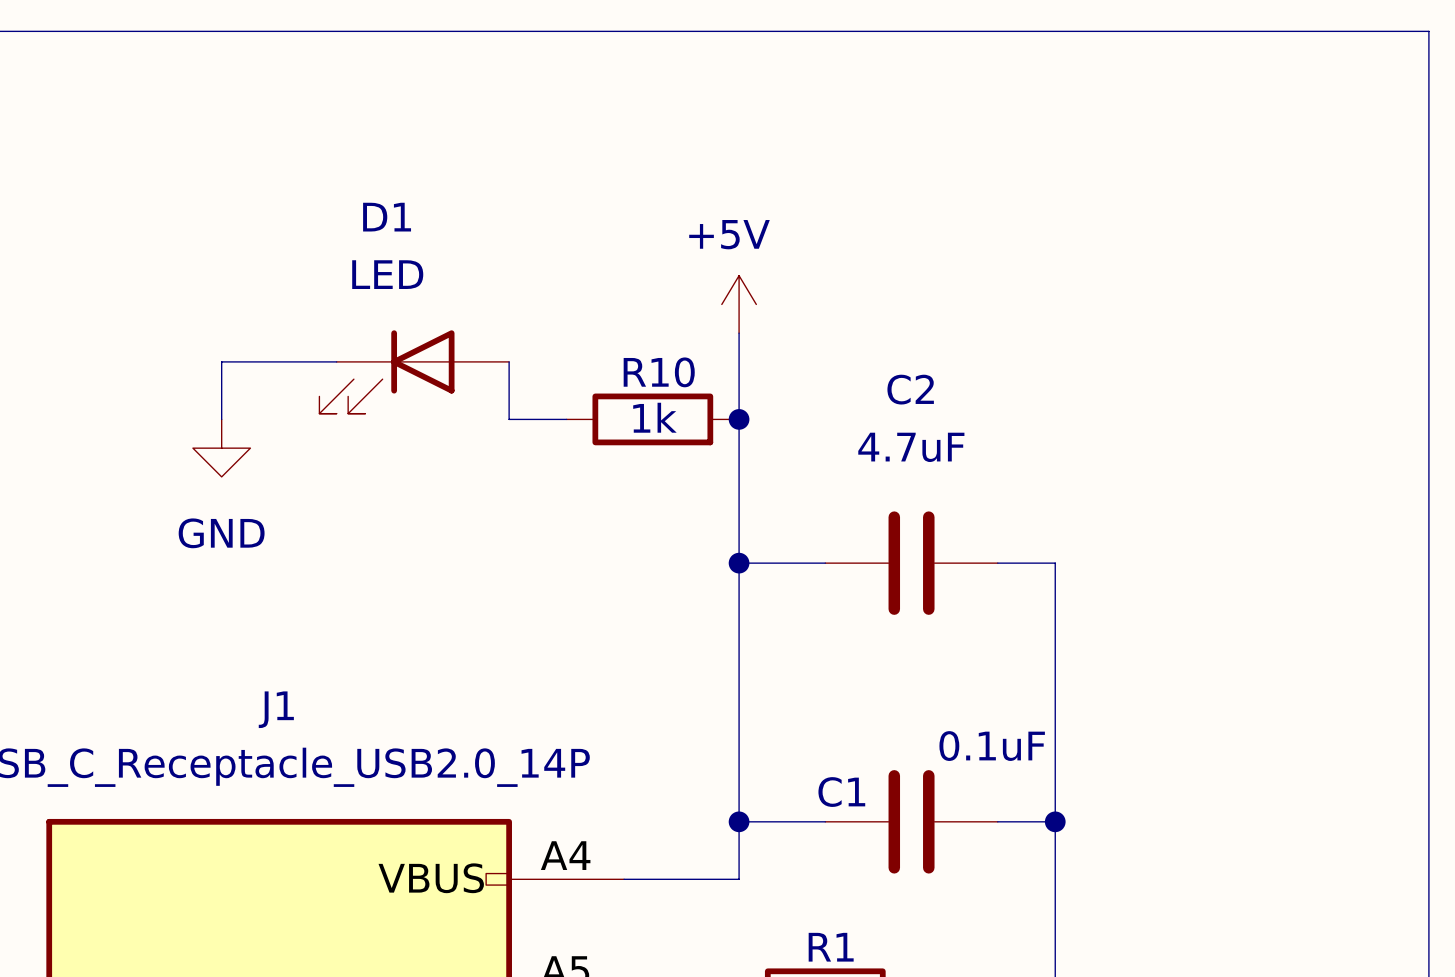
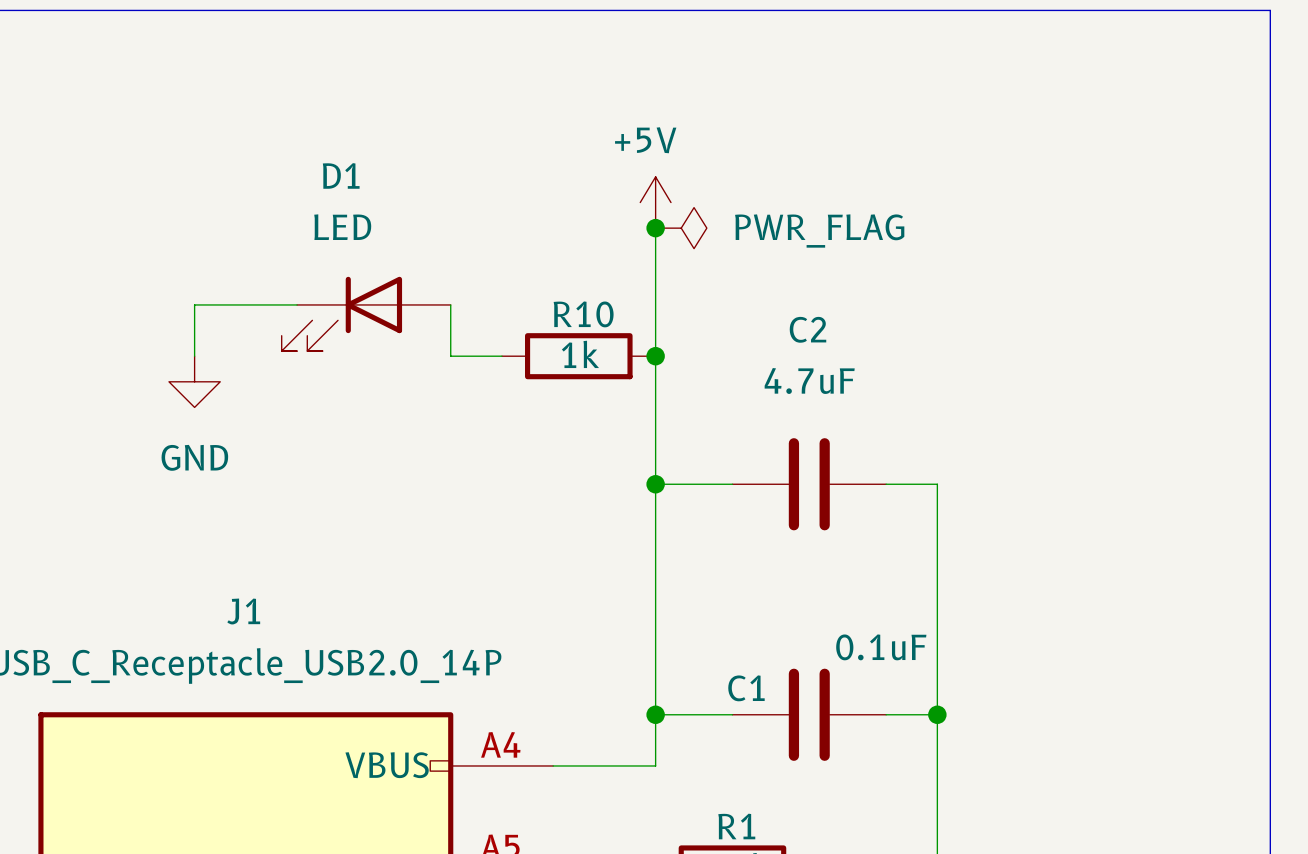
junction: none -> (655, 228)
power symbol: none -> PWR_FLAG (681, 228)
power symbol position: +5V (739, 304) -> +5V (655, 202)

